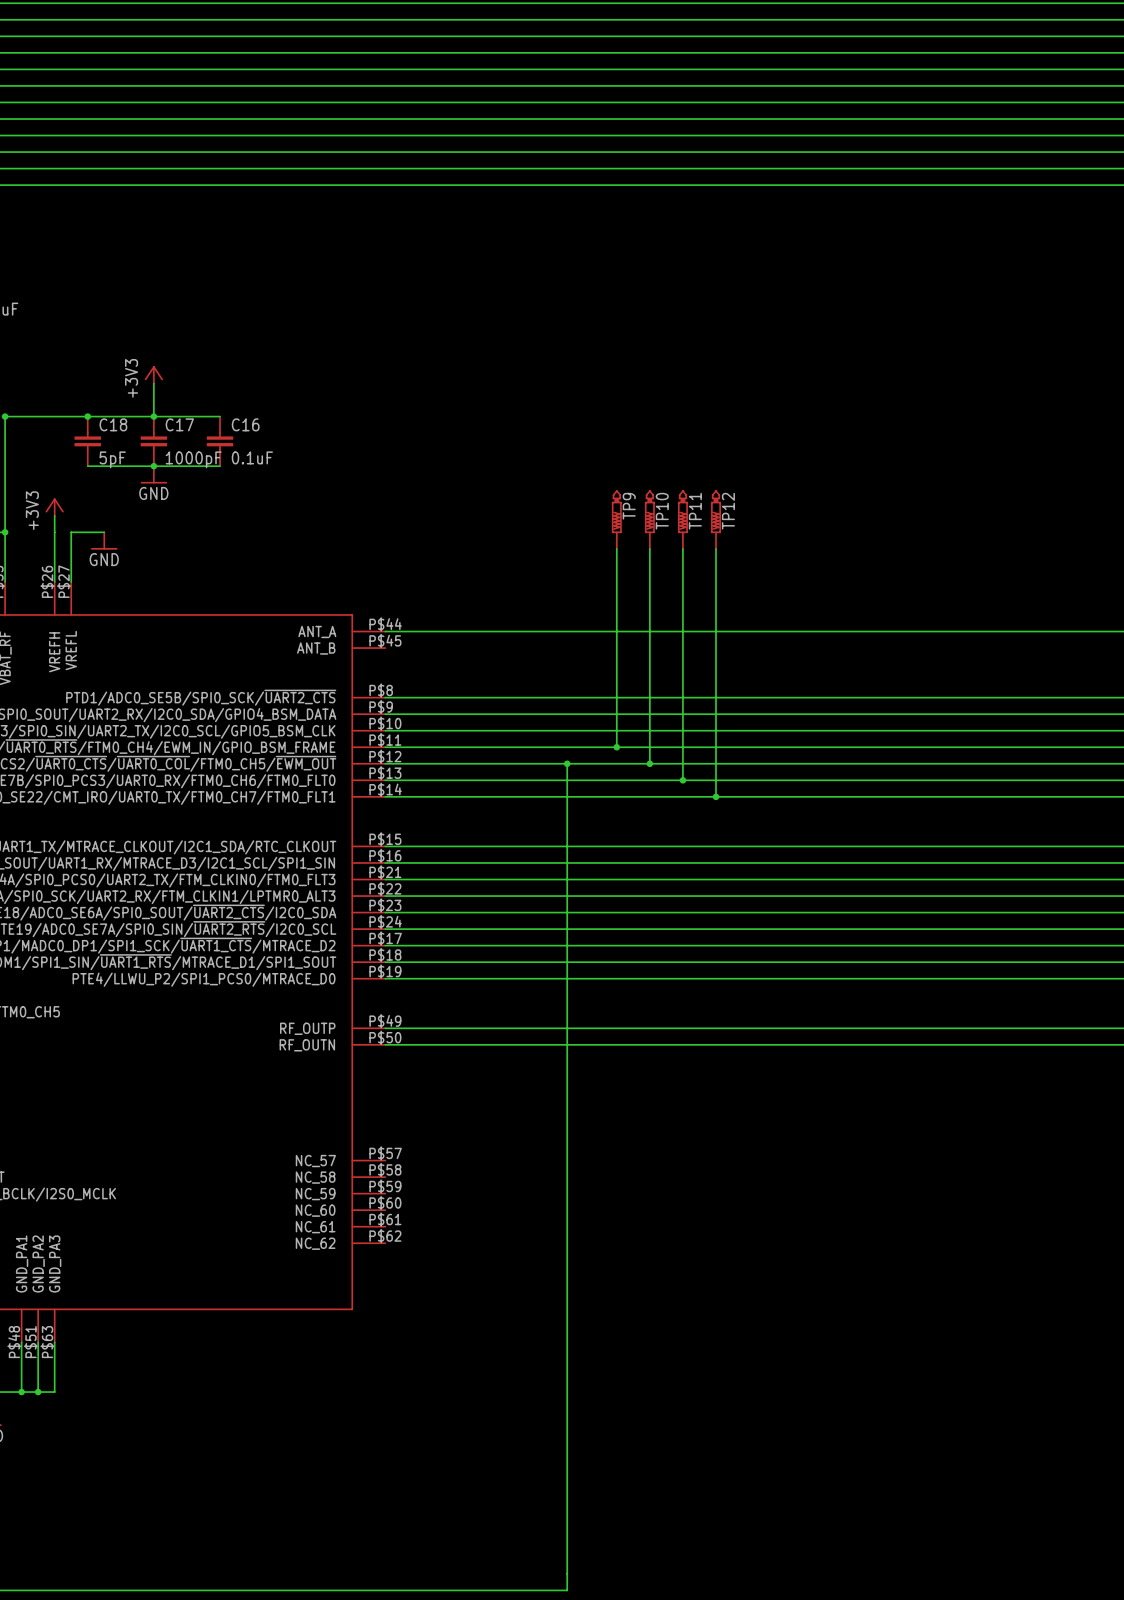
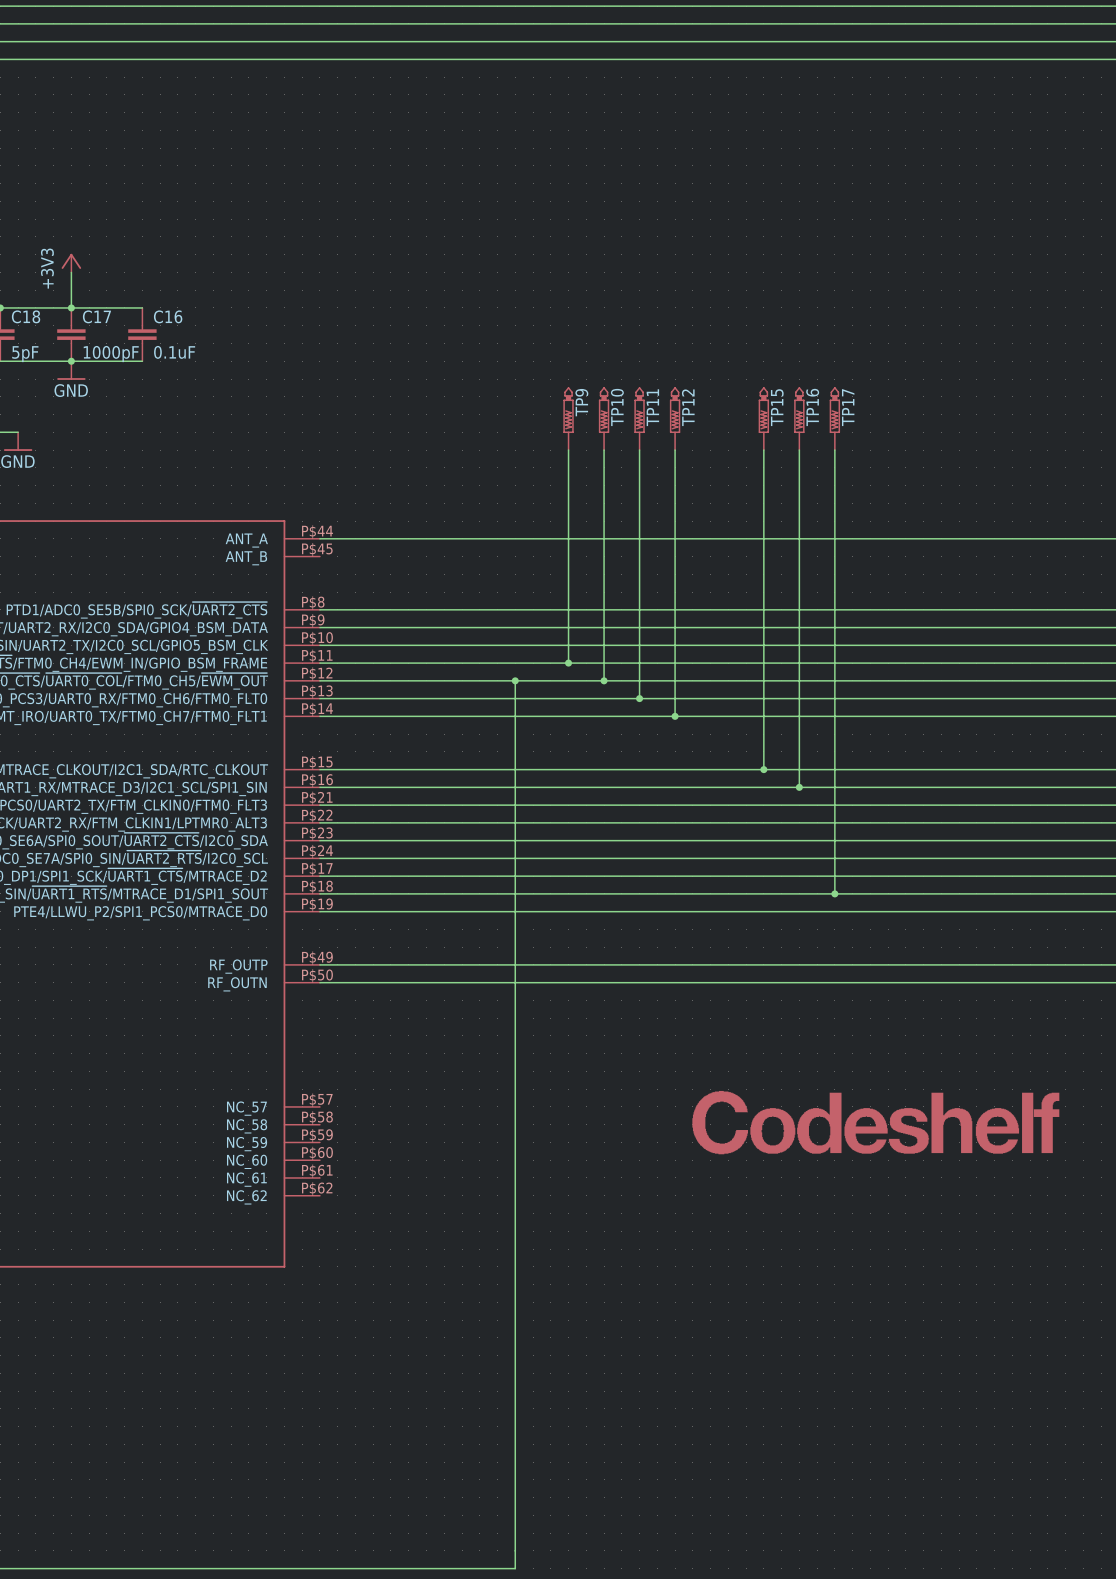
TP15: none -> (763, 418)
TP16: none -> (799, 418)
TP17: none -> (834, 418)
wire: none -> (763, 450) (763, 769)
wire: none -> (799, 450) (799, 787)
wire: none -> (834, 450) (834, 893)
junction: none -> (763, 769)
junction: none -> (799, 787)
junction: none -> (834, 893)
part: none -> (875, 1122)

